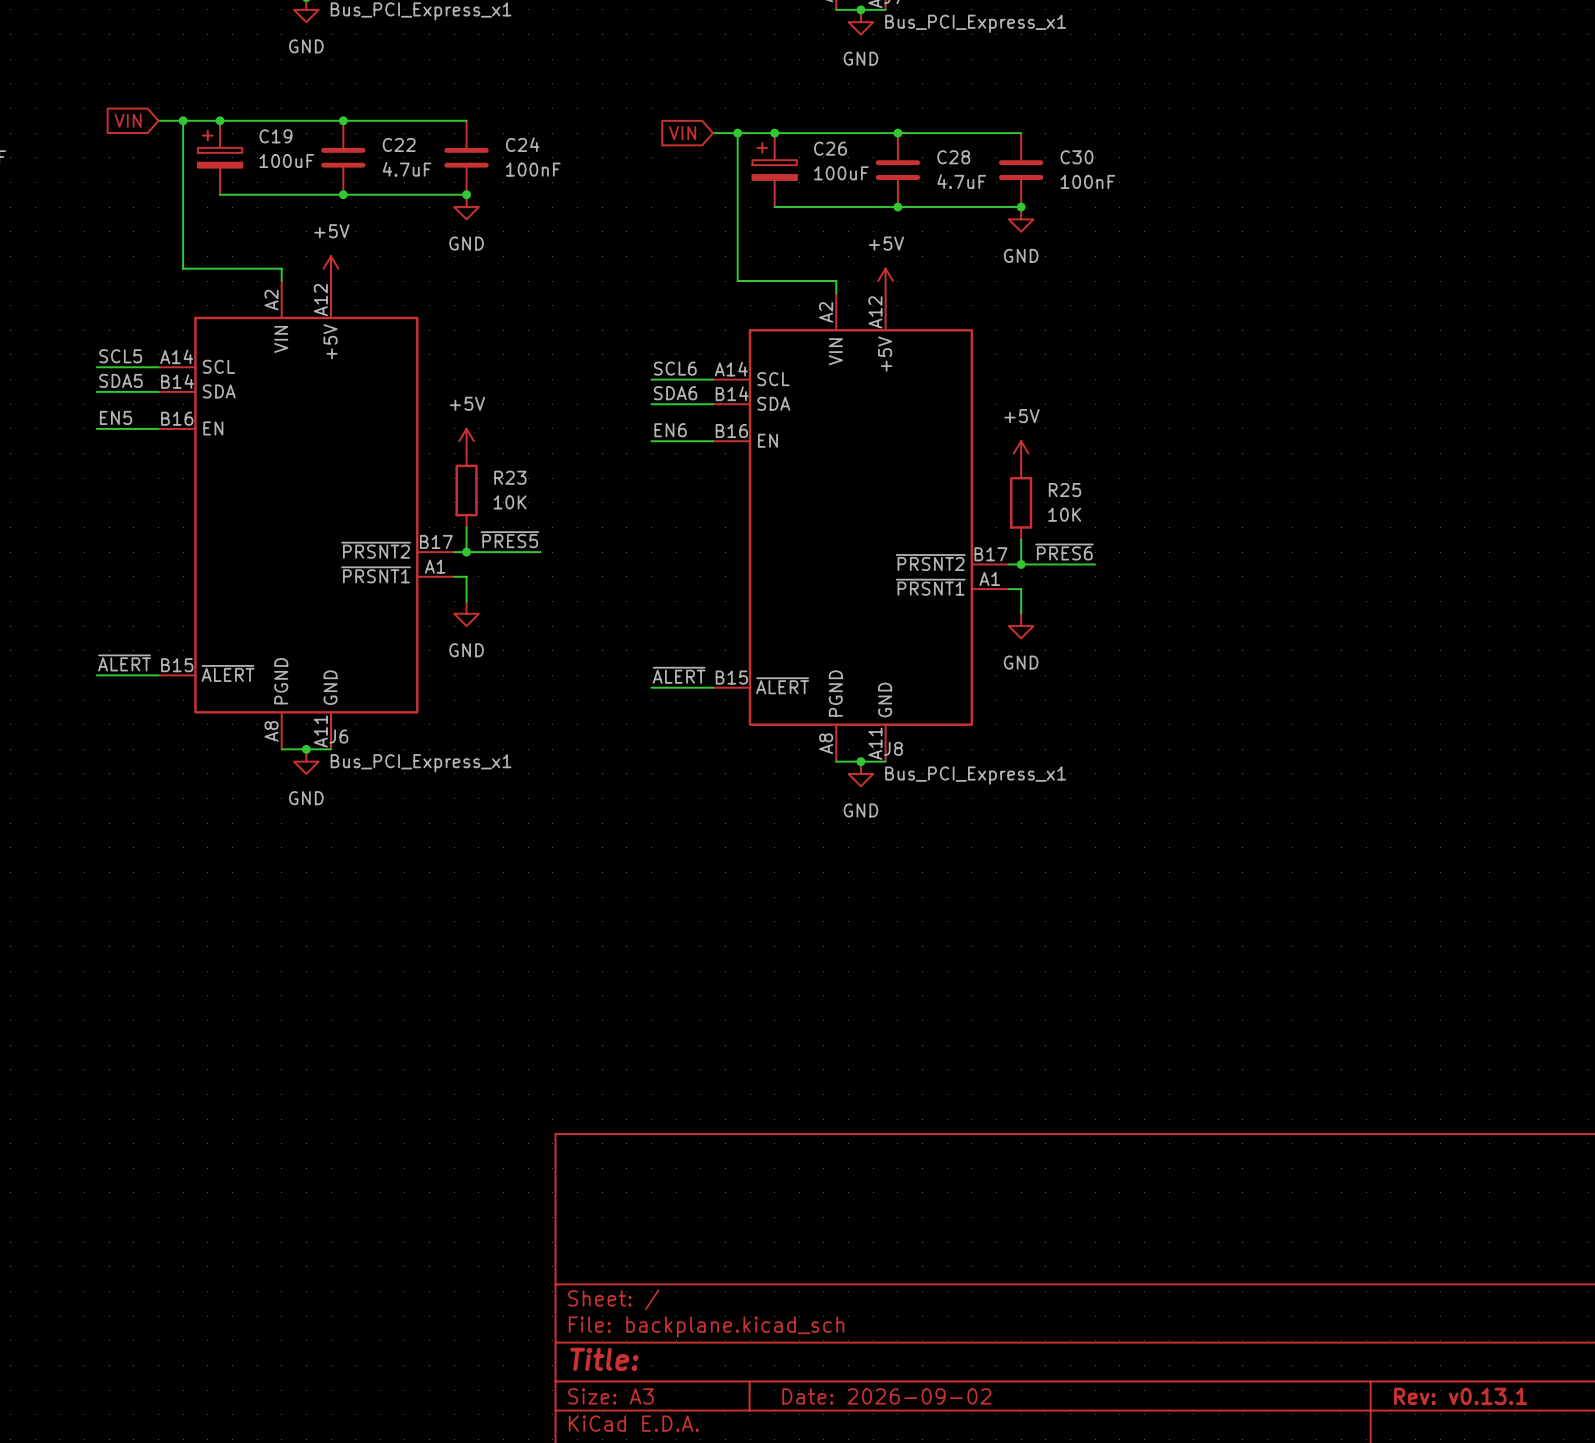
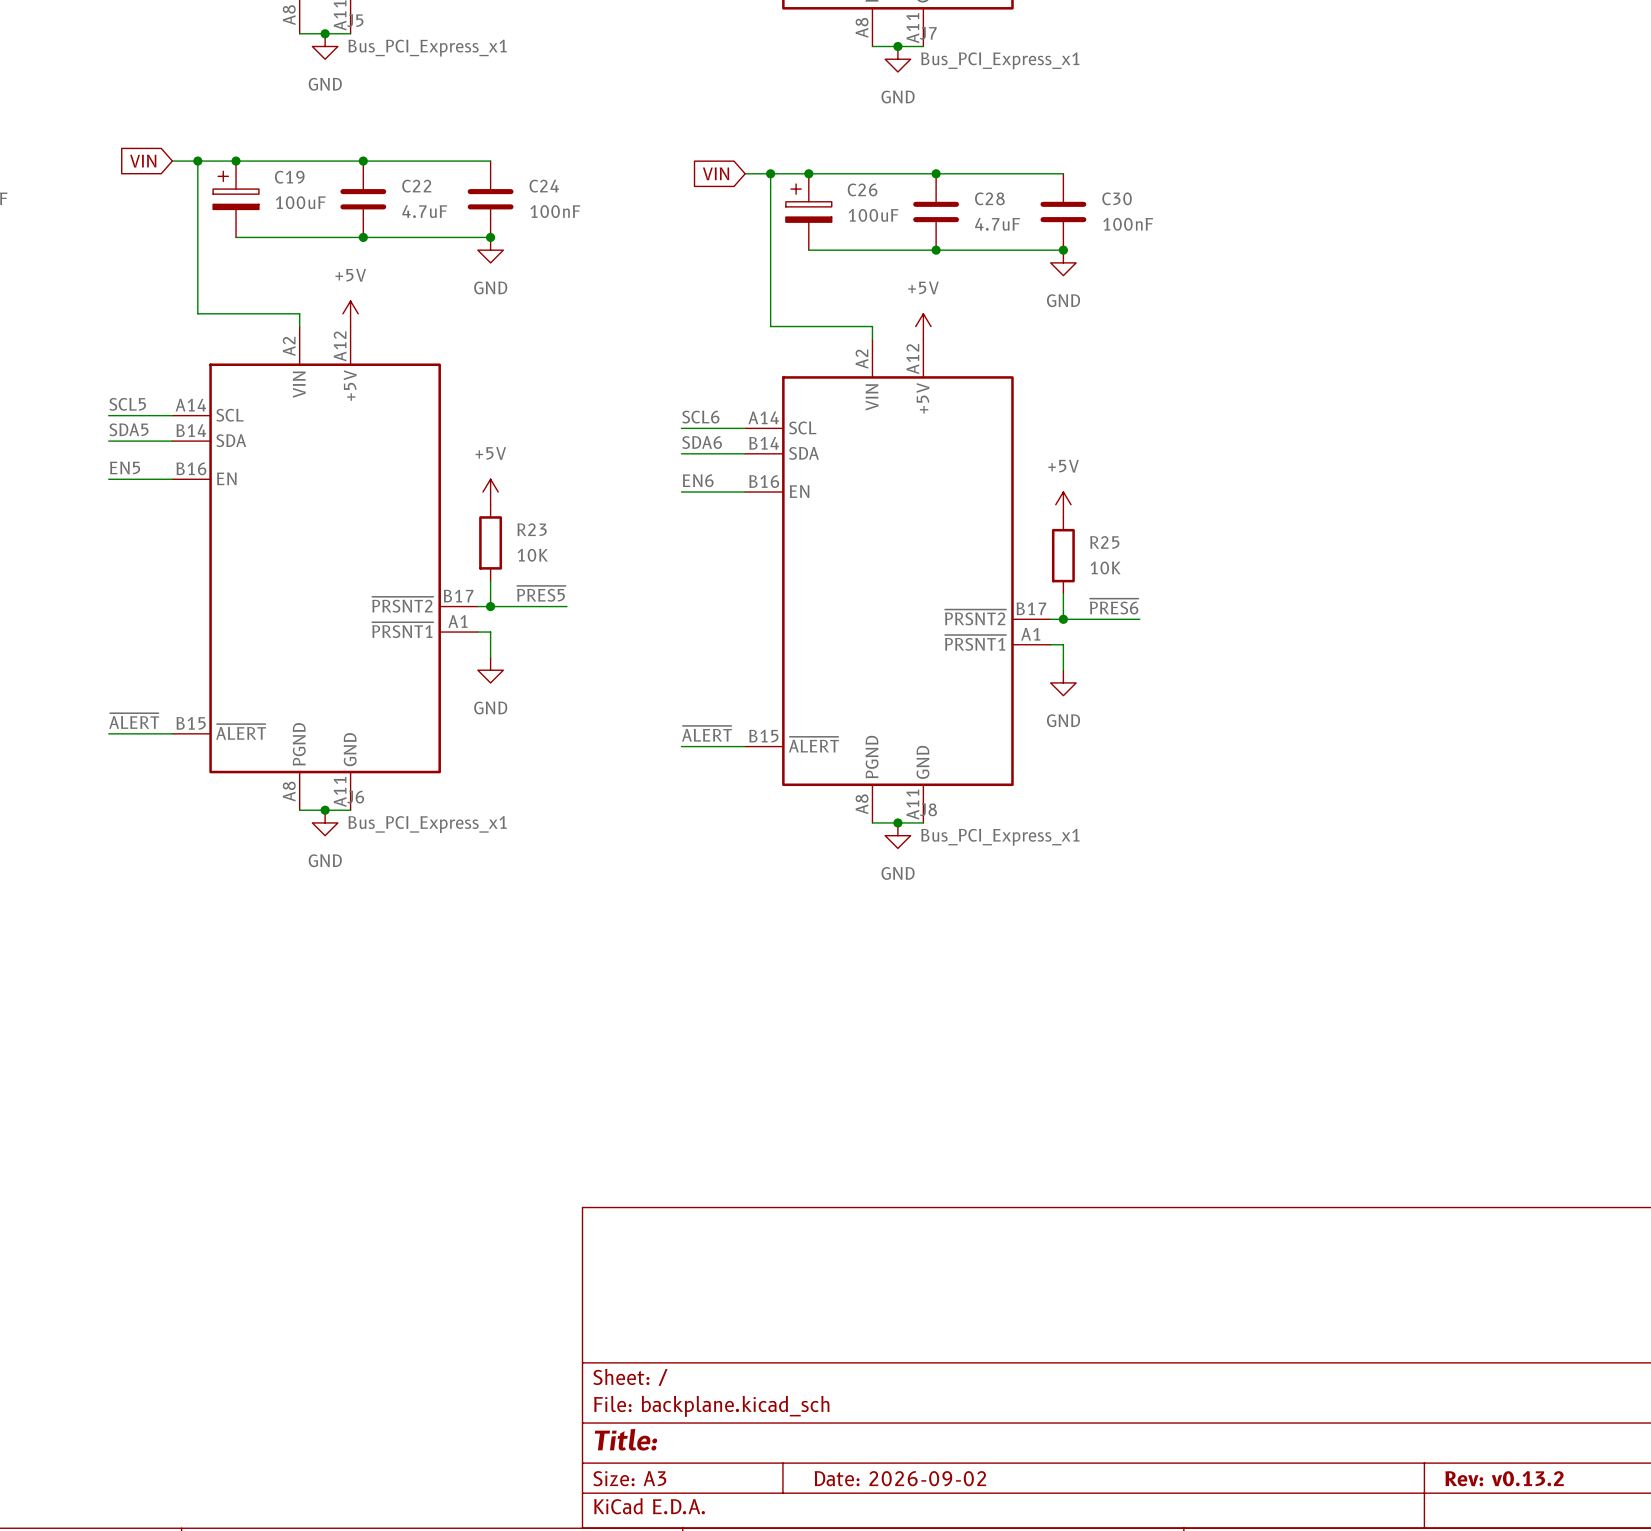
title block: Rev: v0.13.1 (1460, 1396) -> Rev: v0.13.2 (1504, 1478)

